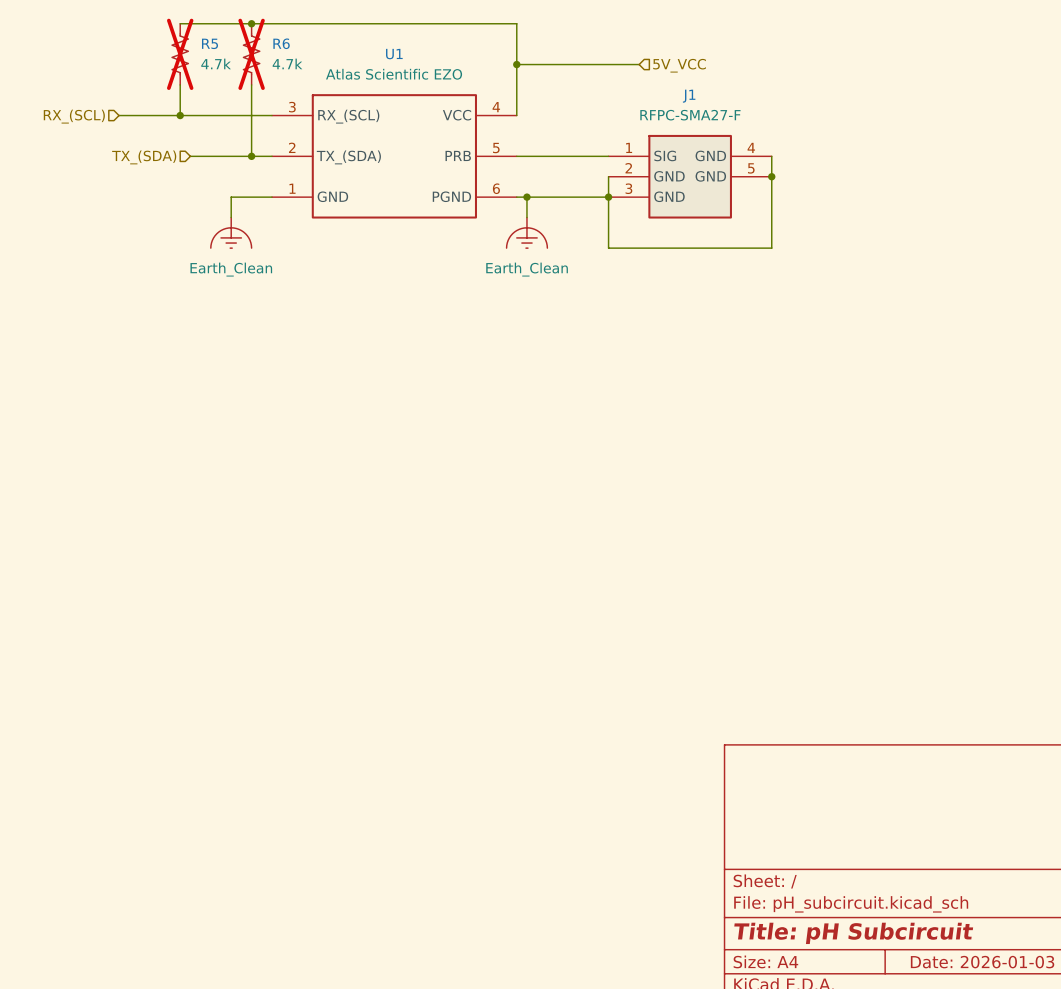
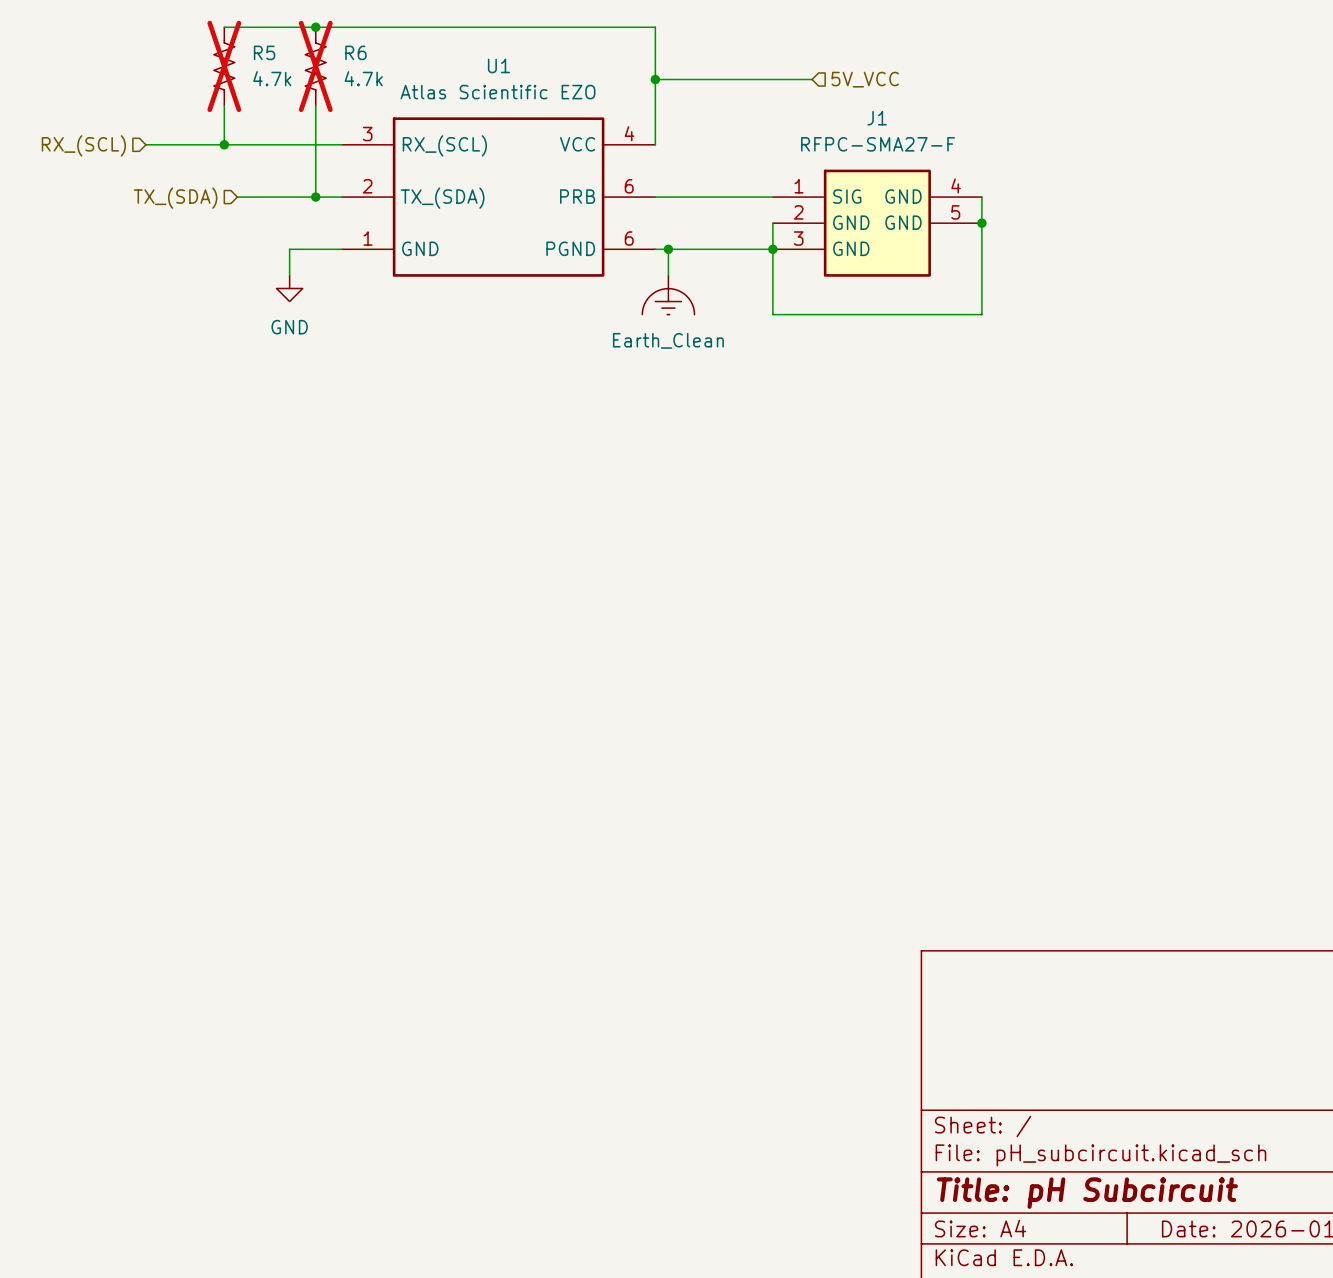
U1 pin number: 5 (496, 148) -> 6 (629, 186)
power symbol: Earth_Clean (231, 232) -> GND (289, 288)

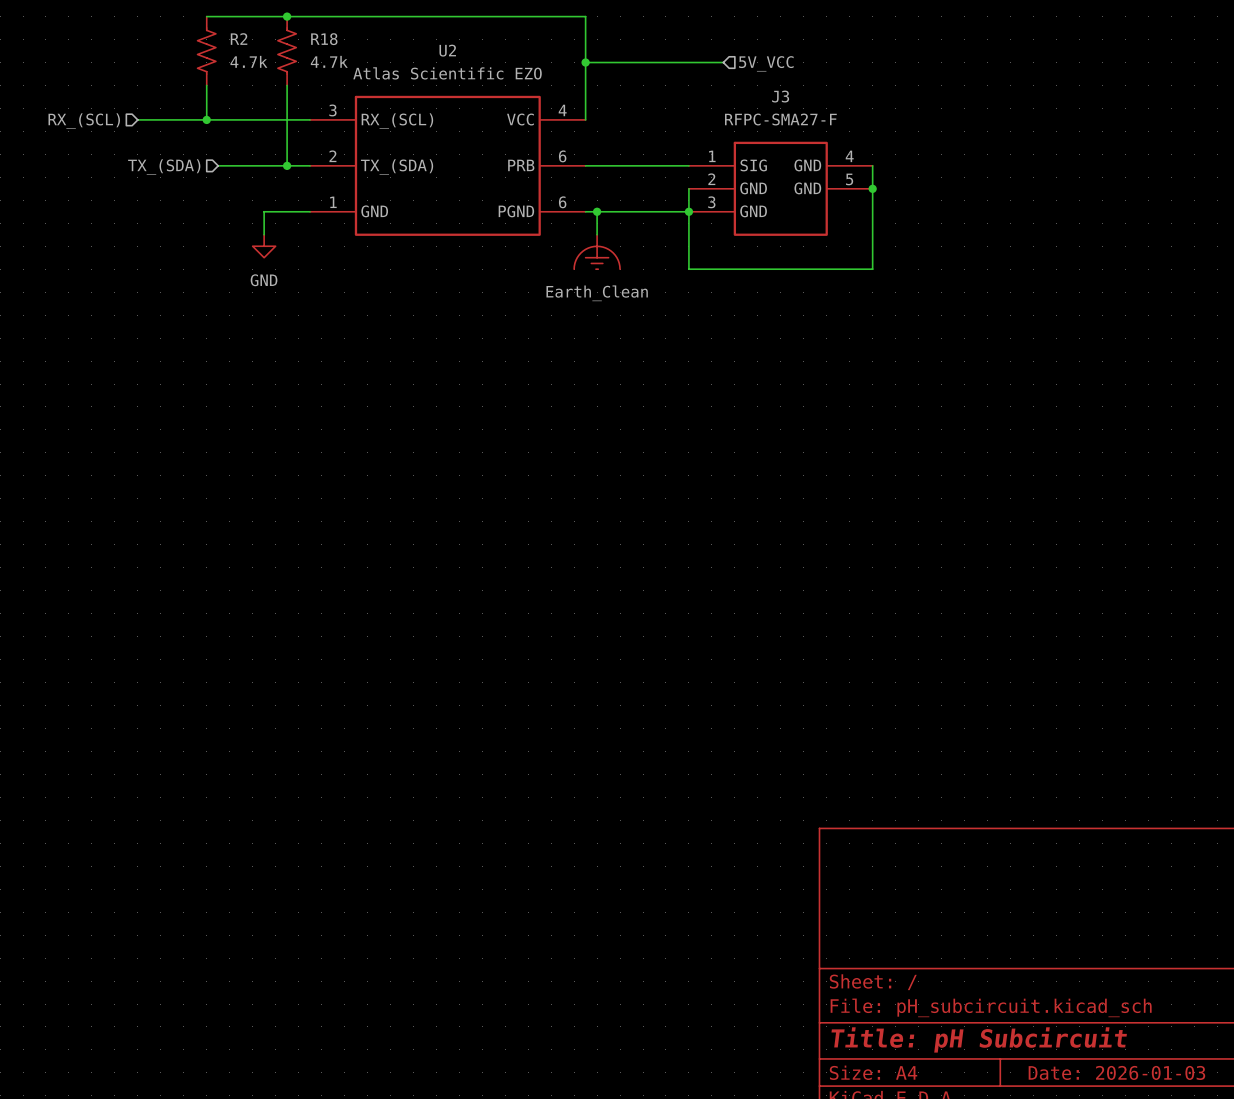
R5 name: R5 (264, 52) -> R2 (239, 39)
R6 name: R6 (355, 52) -> R18 (324, 39)
U1 name: U1 (498, 65) -> U2 (447, 50)
R5 do-not-place cross: (224, 66) -> none
R6 do-not-place cross: (315, 66) -> none
J1 name: J1 (877, 118) -> J3 (780, 96)

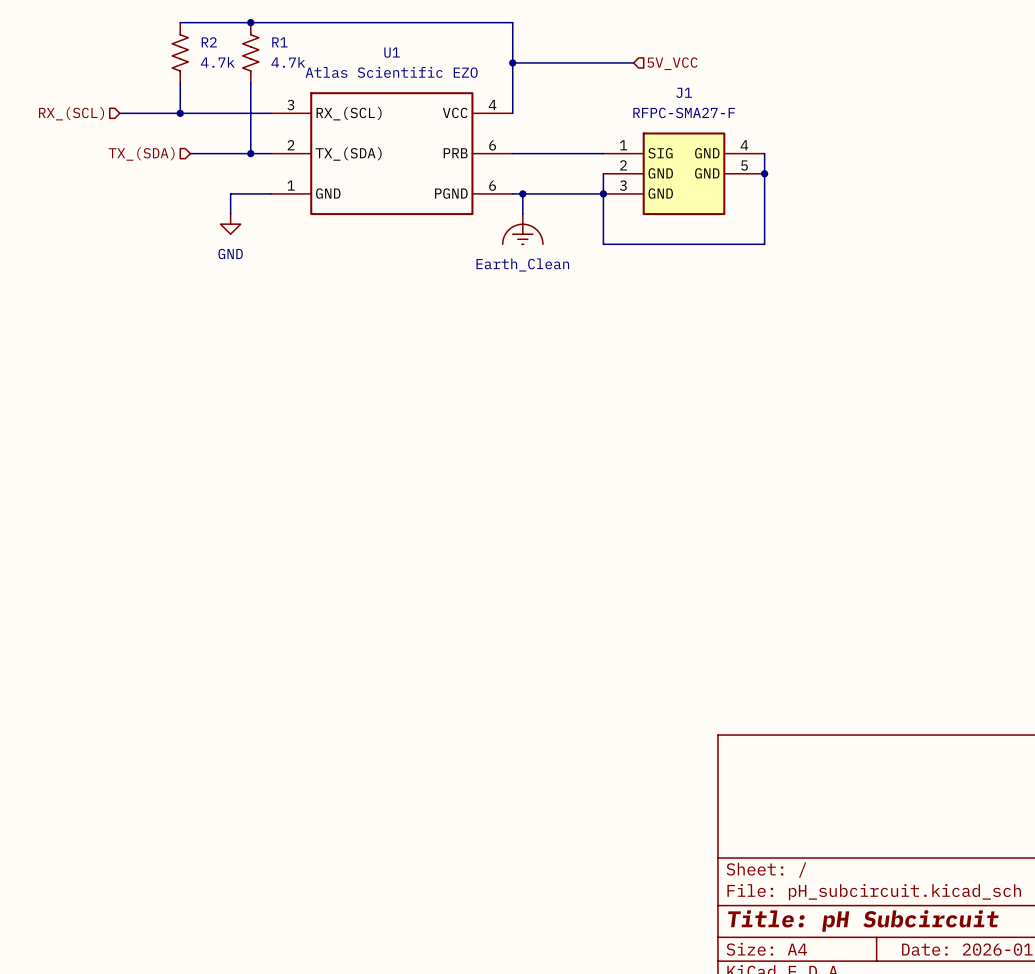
R18 name: R18 (324, 39) -> R1 (279, 42)
U2 name: U2 (447, 50) -> U1 (392, 52)
J3 name: J3 (780, 96) -> J1 (684, 92)

